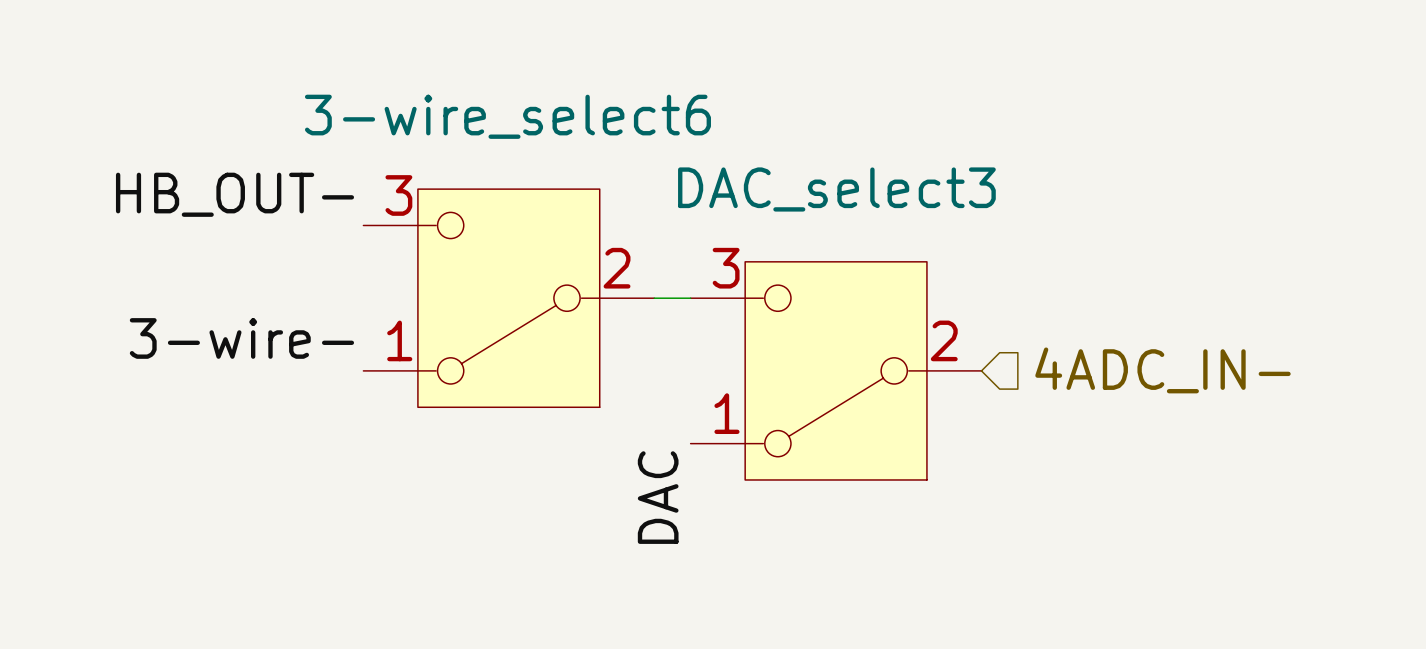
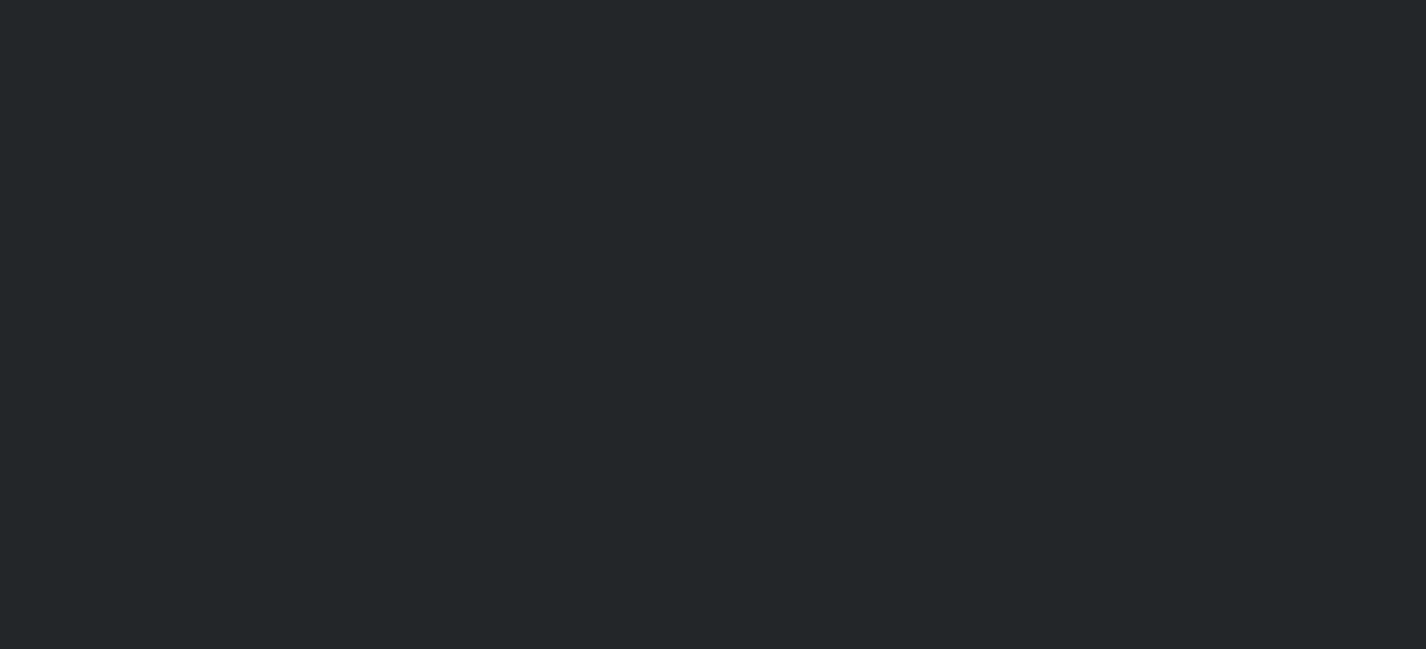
label: HB_OUT- (234, 194) -> none
3-wire_select6: (508, 298) -> none
wire: (654, 298) (690, 298) -> none
label: 3-wire- (241, 338) -> none
DAC_select3: (836, 370) -> none
hierarchical label: 4ADC_IN- (1162, 370) -> none
label: DAC (658, 497) -> none

